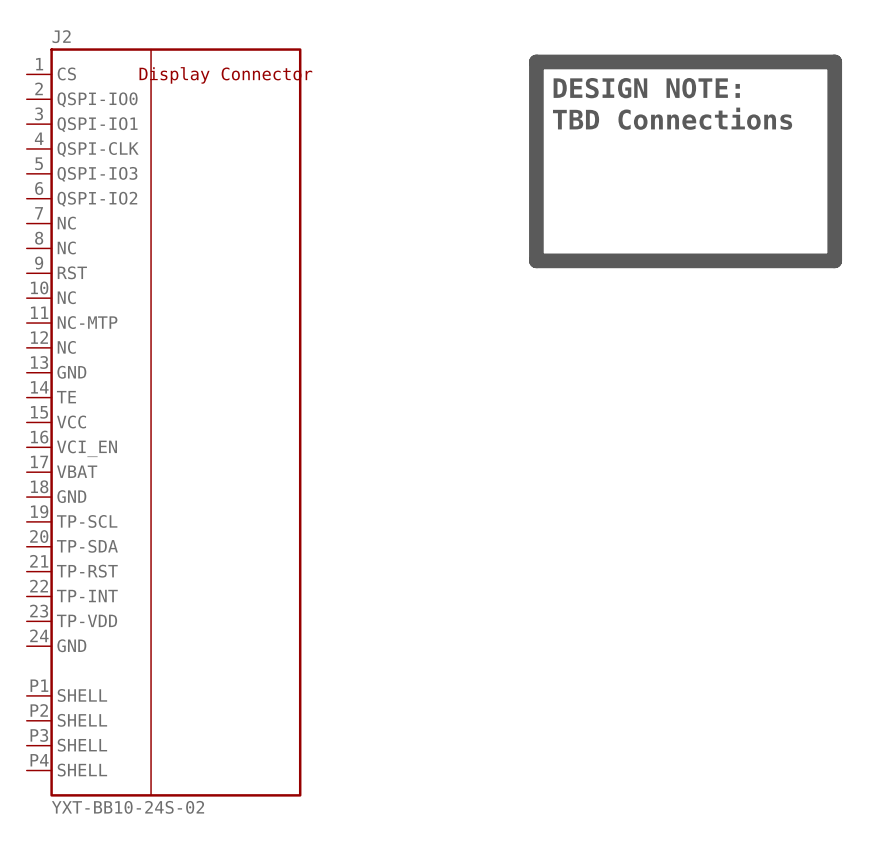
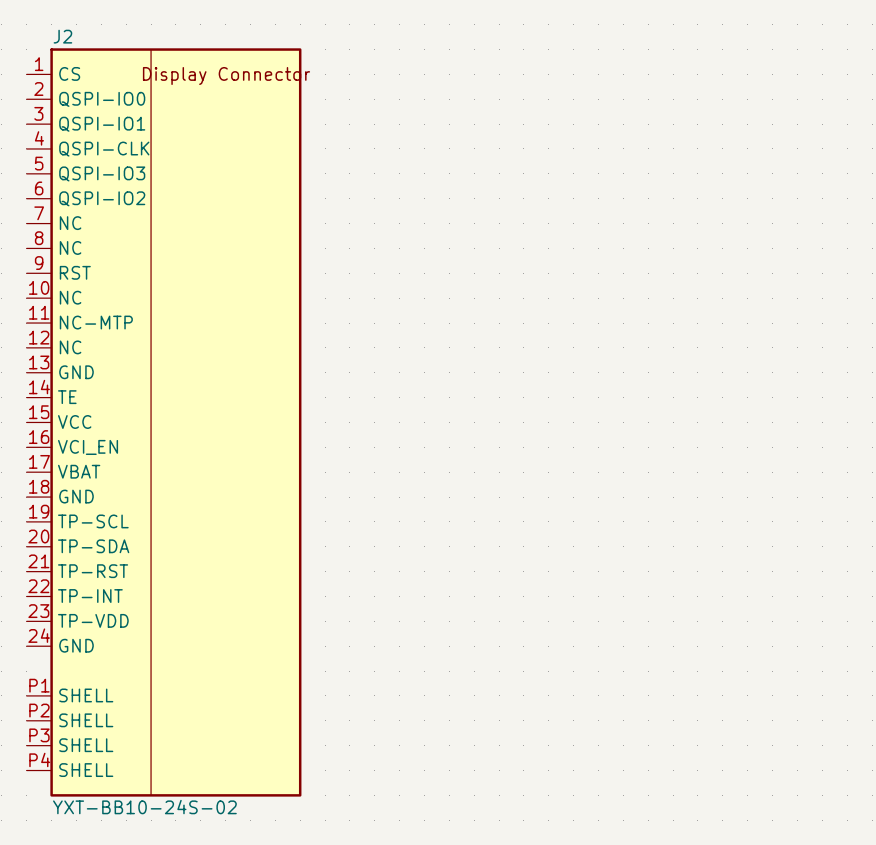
line: (536, 61) (834, 61) (834, 260) (536, 260) (536, 61) -> none
text: DESIGN NOTE: (646, 88) -> none
text: TBD Connections (672, 118) -> none

